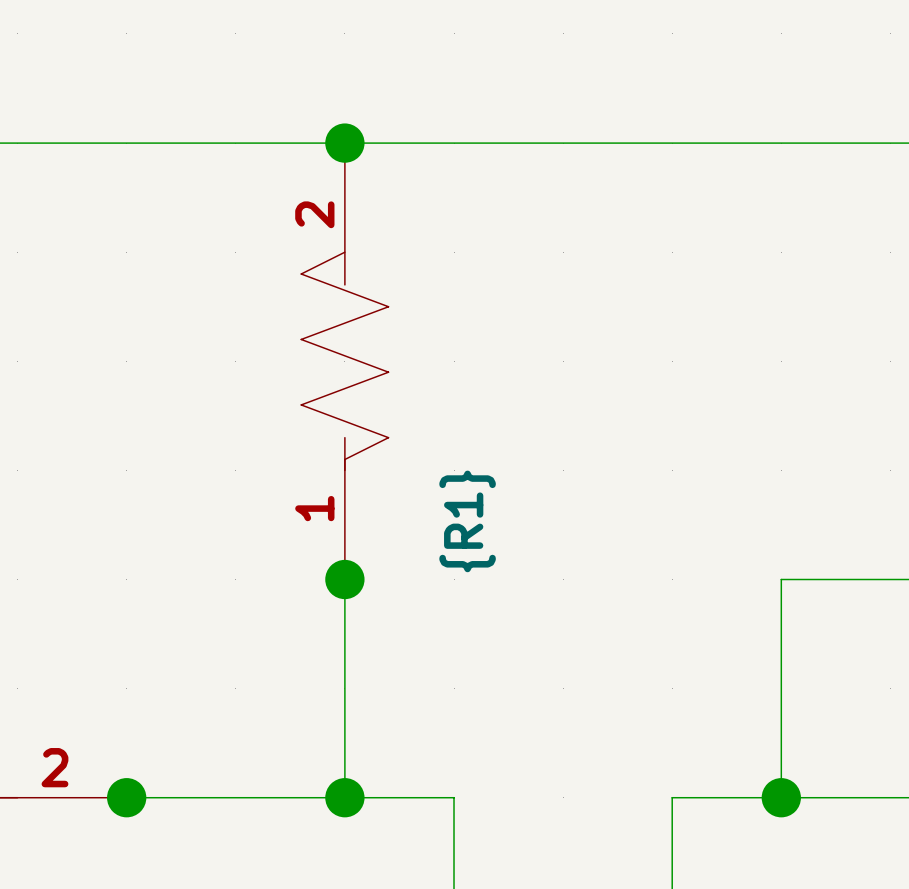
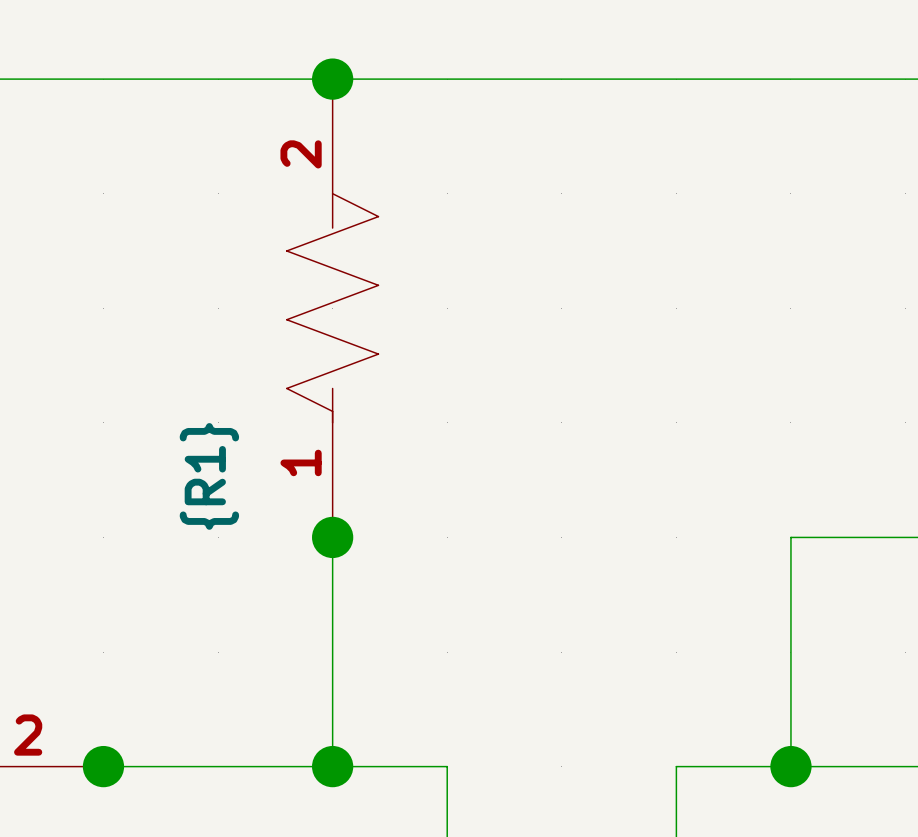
part flip: as is (344, 361) -> left-right (332, 308)

